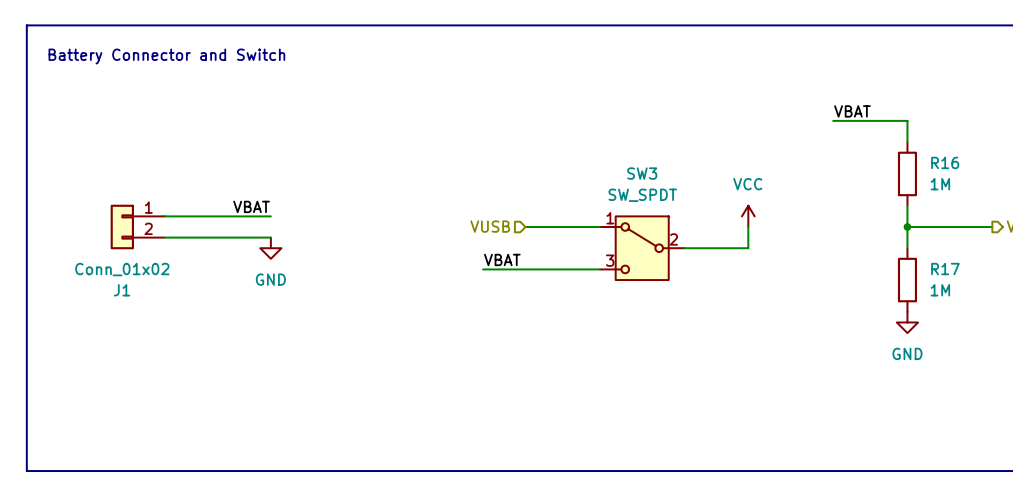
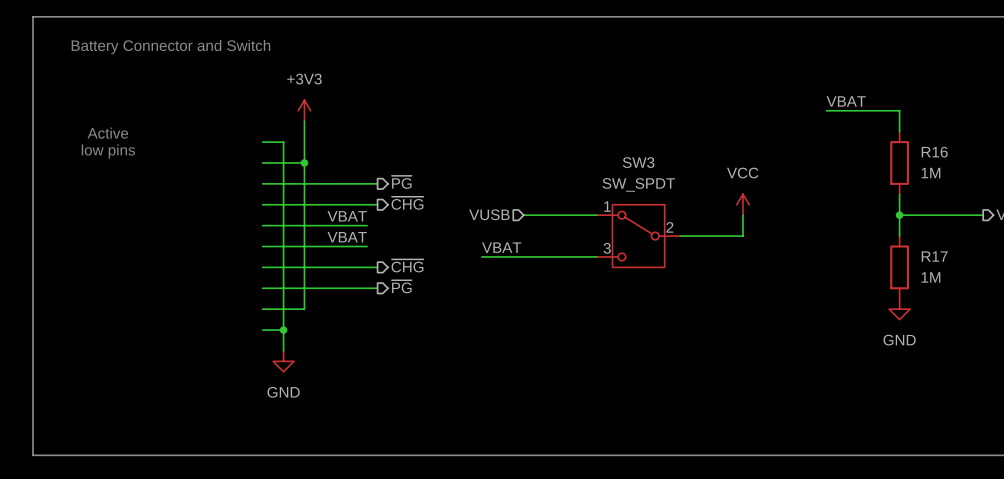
power symbol: none -> +3V3 (304, 110)
wire: none -> (304, 121) (304, 309) (262, 309)
text: none -> Active (107, 133)
wire: none -> (262, 142) (283, 142) (283, 350)
text: none -> low pins (108, 151)
wire: none -> (262, 162) (304, 162)
junction: none -> (304, 162)
hierarchical label: none -> ~{PG} (401, 182)
wire: none -> (262, 183) (377, 183)
label: VBAT (251, 206) -> none
hierarchical label: none -> ~{CHG} (407, 203)
wire: (164, 216) (260, 216) -> none
wire: none -> (273, 204) (377, 204)
J1: Conn_01x02 (137, 226) -> none
label: none -> VBAT (347, 216)
wire: (164, 237) (260, 237) -> (273, 225) (367, 225)
power symbol position: GND (270, 248) -> GND (283, 361)
label: none -> VBAT (347, 237)
wire: none -> (262, 246) (367, 246)
hierarchical label: none -> ~{CHG} (407, 265)
wire: none -> (262, 267) (377, 267)
hierarchical label: none -> ~{PG} (401, 286)
wire: none -> (262, 288) (377, 288)
wire: none -> (262, 330) (283, 330)
junction: none -> (283, 330)

